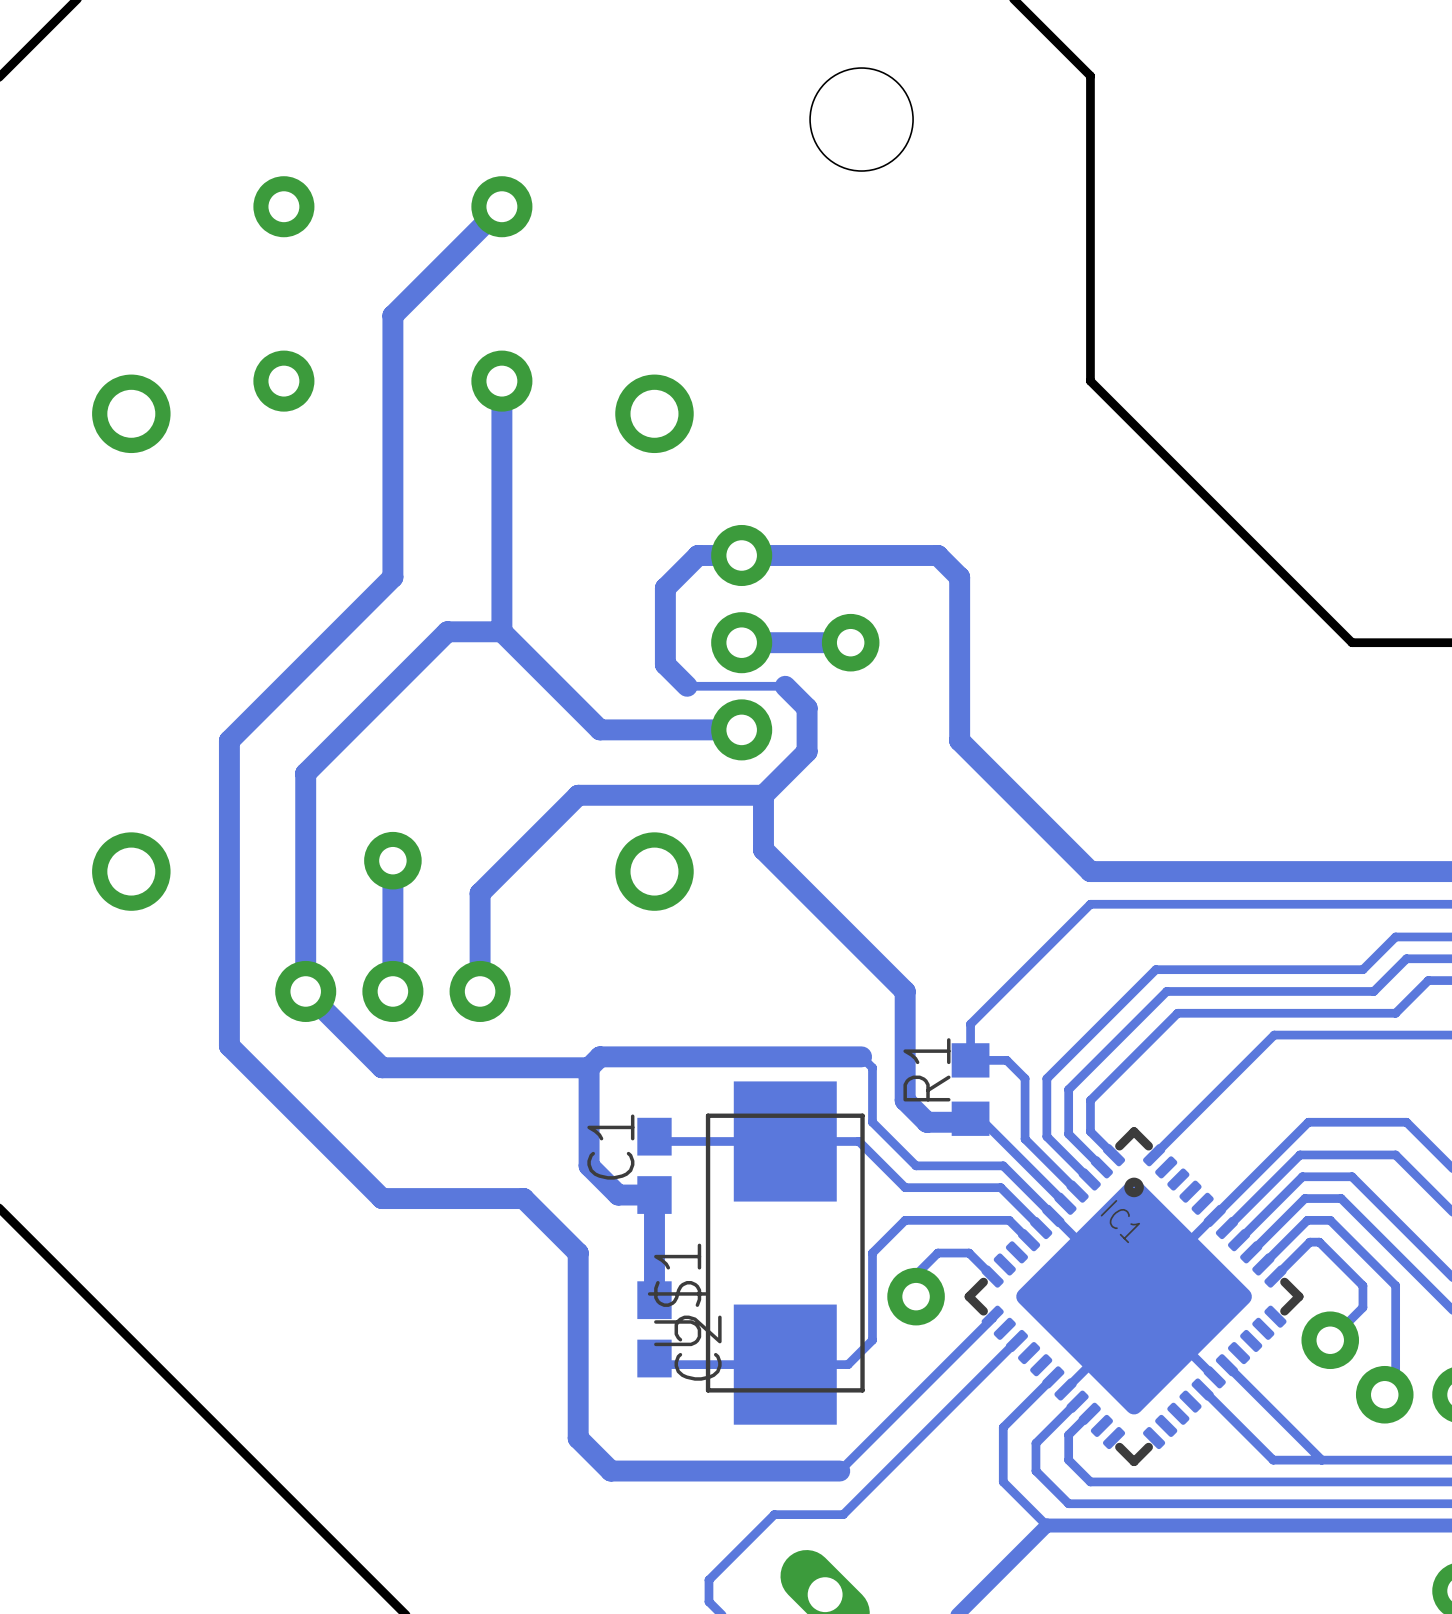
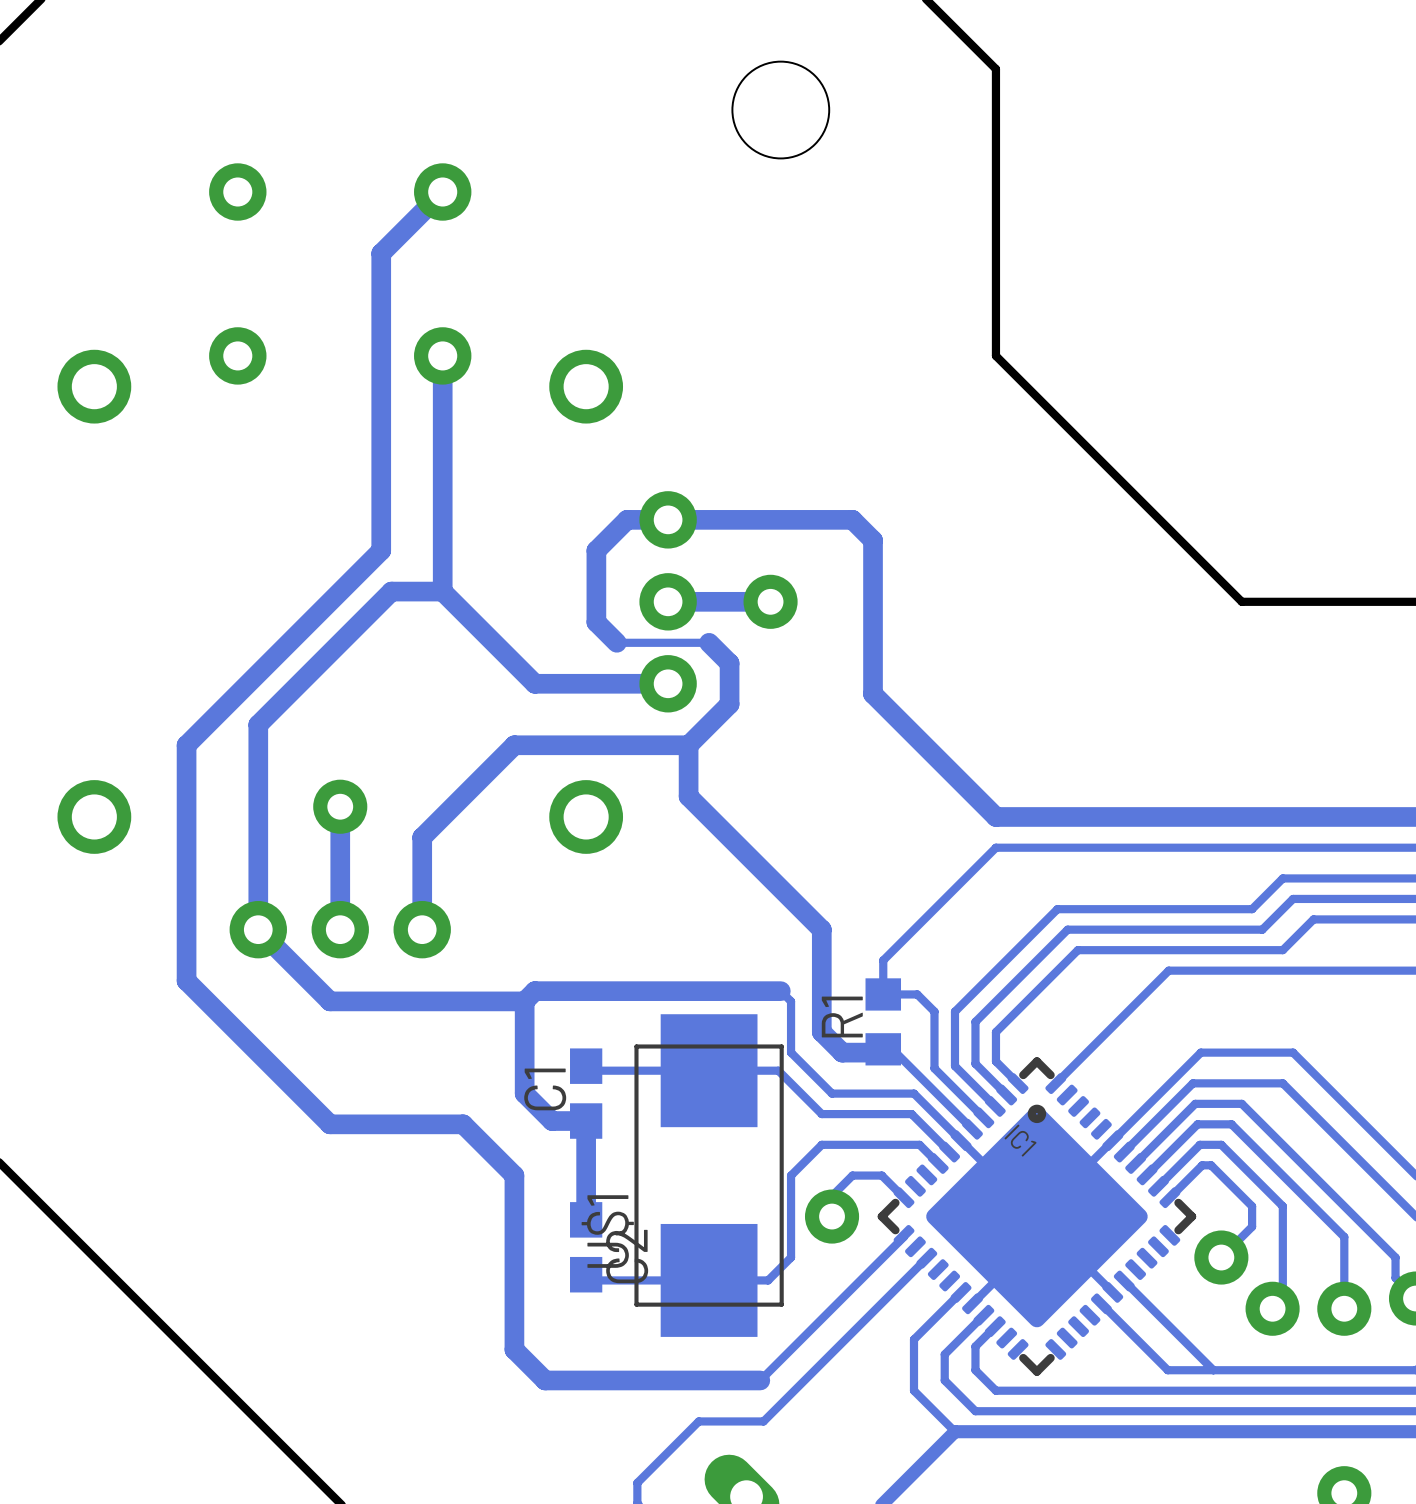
track: (436, 272) (392, 315) (392, 577) (229, 740) (229, 795) -> (381, 253) (381, 550) (186, 745)

